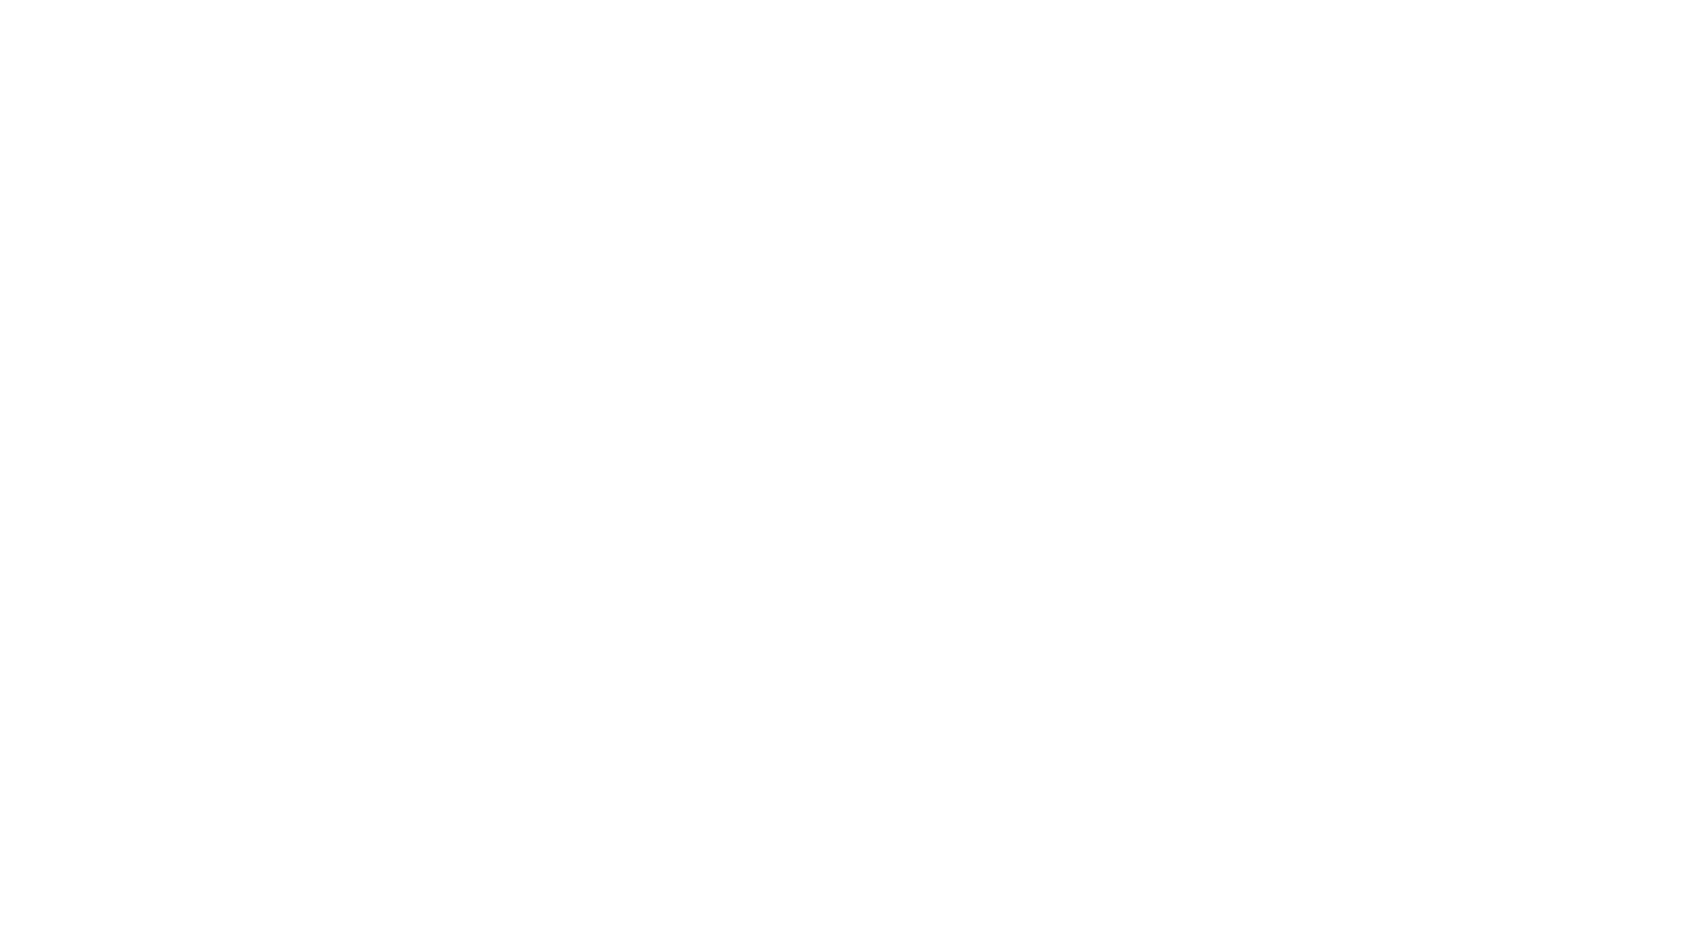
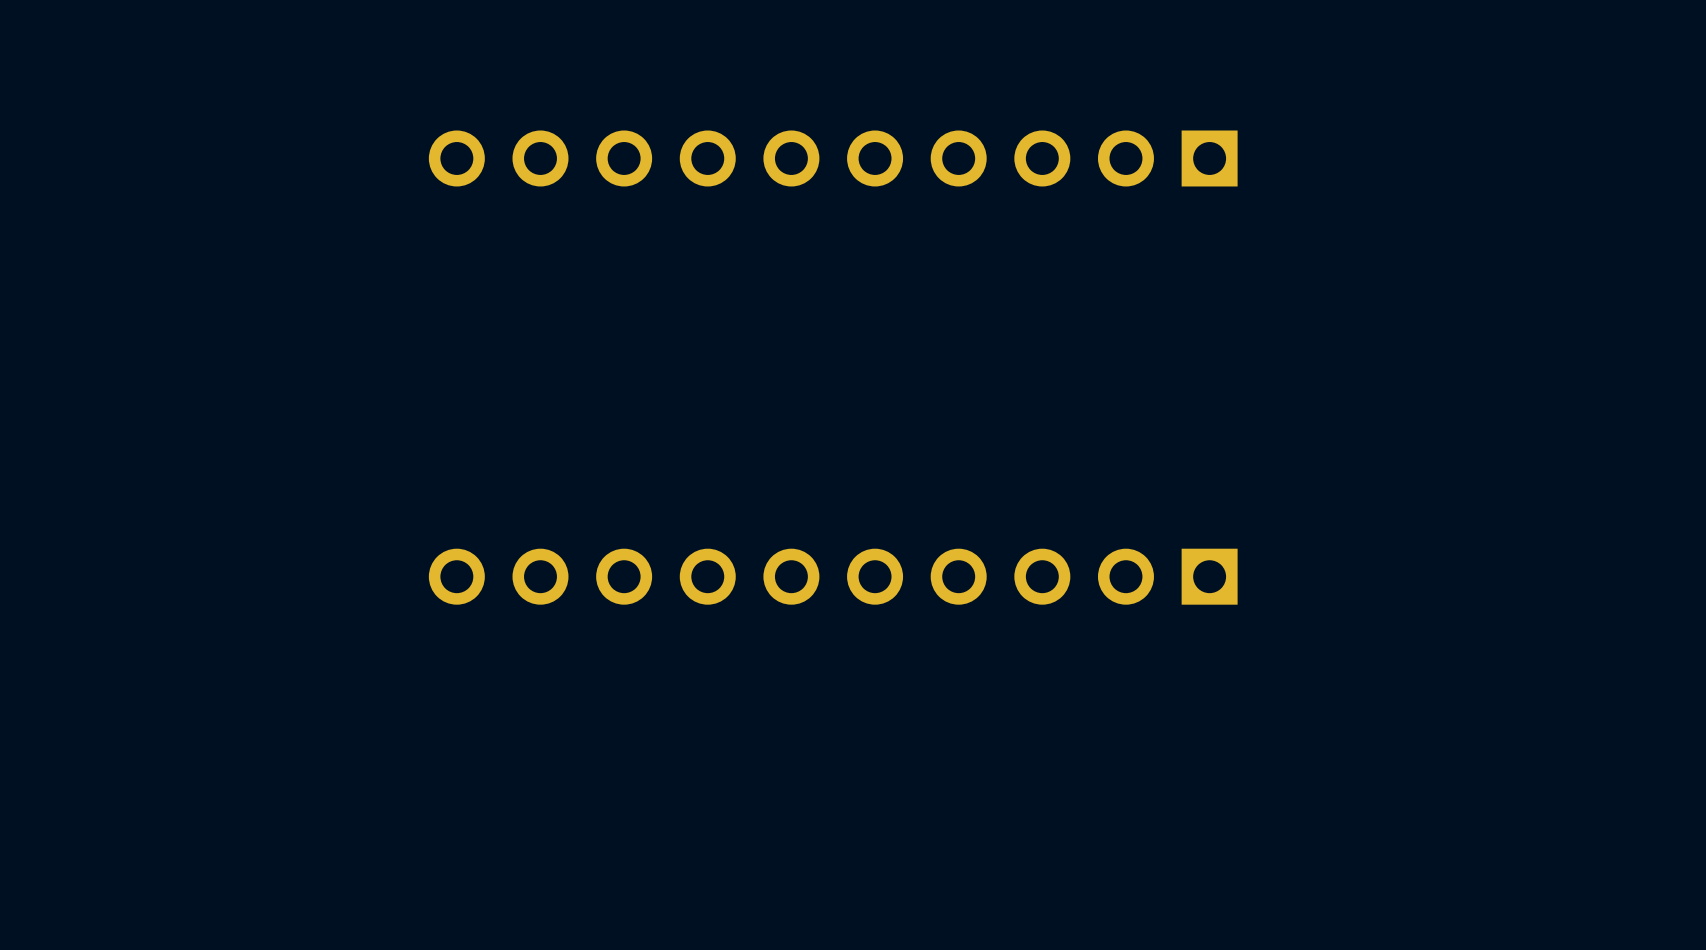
part: none -> (833, 158)
part: none -> (833, 576)

